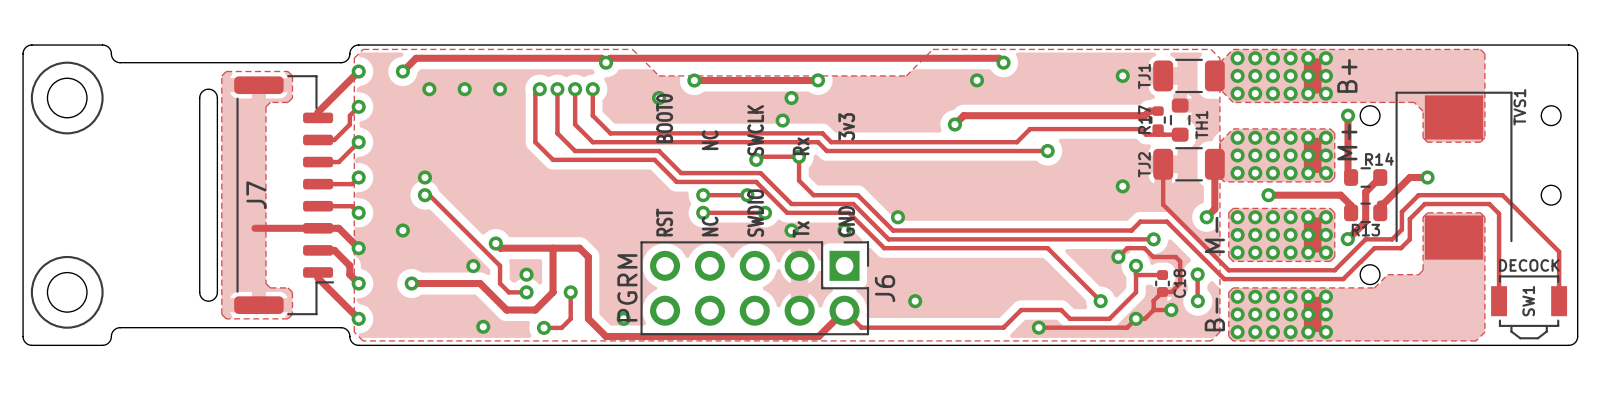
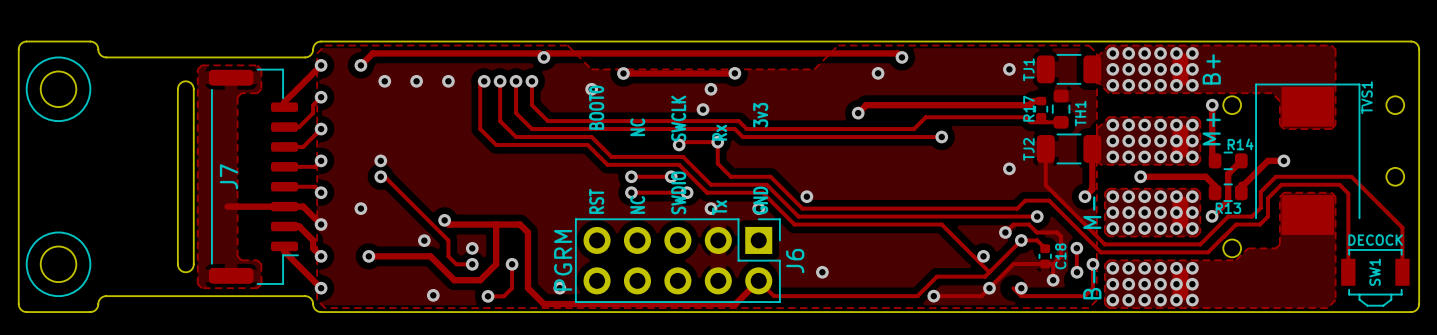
track: (1136, 265) (1136, 292) (1109, 318) (1069, 318) (1061, 310) (1021, 310) (1003, 327) -> (1045, 248) (1037, 240) (1021, 240) (985, 276) (936, 276) (917, 296) (901, 296)
track: (1136, 274) (1162, 275) -> none
via: none -> (983, 256)
track: (1162, 291) (1153, 300) (1153, 310) -> none
track: none -> (1092, 264) (1092, 288) (1084, 296) (1021, 296) (1013, 288)
via: none -> (1092, 264)
via: (1100, 301) -> none
track: (1153, 310) (1144, 318) (1136, 318) (1127, 327) (1091, 327) -> (1045, 264) (1013, 264) (981, 296)
track: (1153, 310) (1171, 310) -> (1052, 264) (1053, 280)
via: none -> (989, 288)

